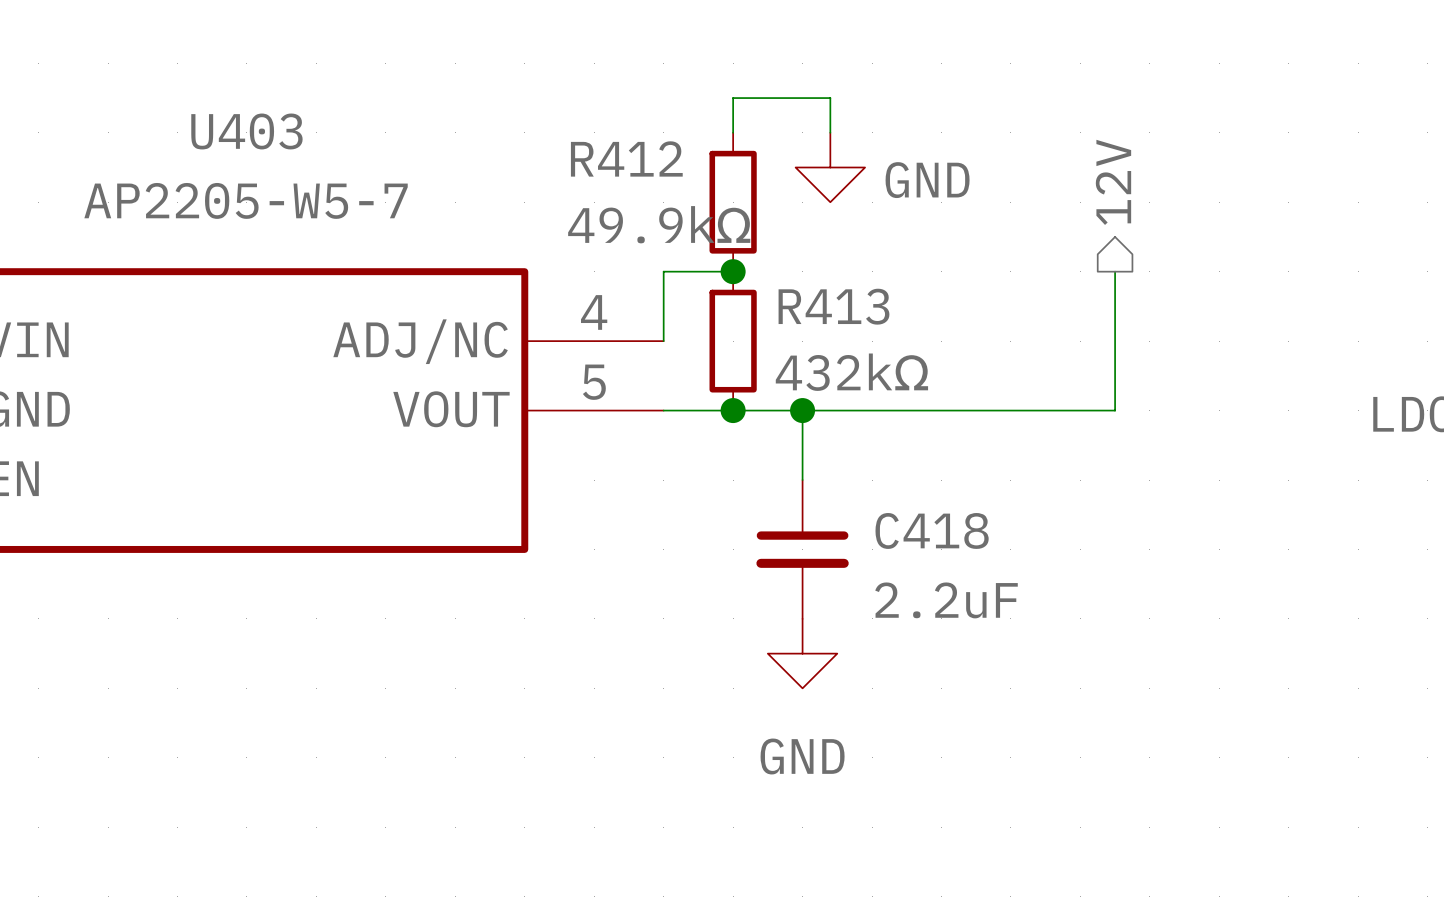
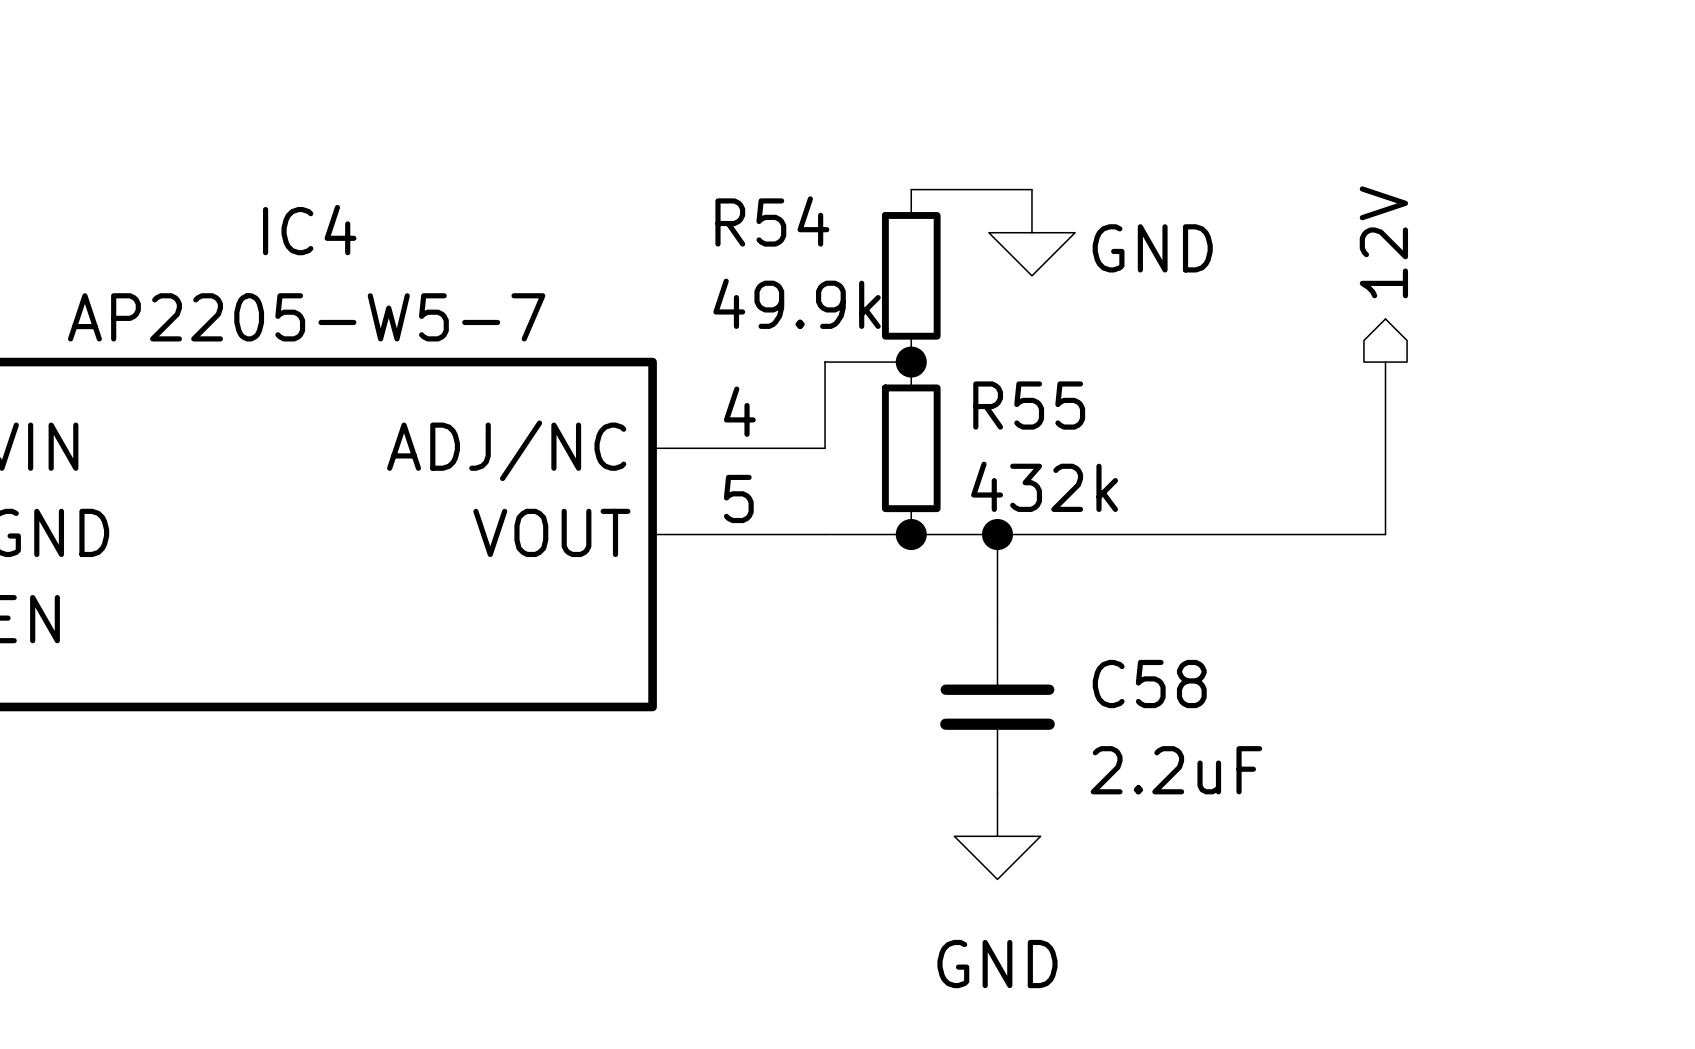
U403 name: U403 (246, 131) -> IC4 (309, 230)
wire: (733, 132) (733, 98) (830, 98) (830, 132) -> (911, 189) (1031, 189)
R412 name: R412 (626, 158) -> R54 (772, 221)
U403 value position: AP2205-W5-7 (246, 200) -> AP2205-W5-7 (306, 317)
R412 value: 49.9kΩ (659, 224) -> 49.9k (797, 303)
R413 name: R413 (833, 306) -> R55 (1029, 405)
R413 value: 432kΩ (851, 372) -> 432k (1044, 486)
C418 name: C418 (932, 530) -> C58 (1149, 684)

